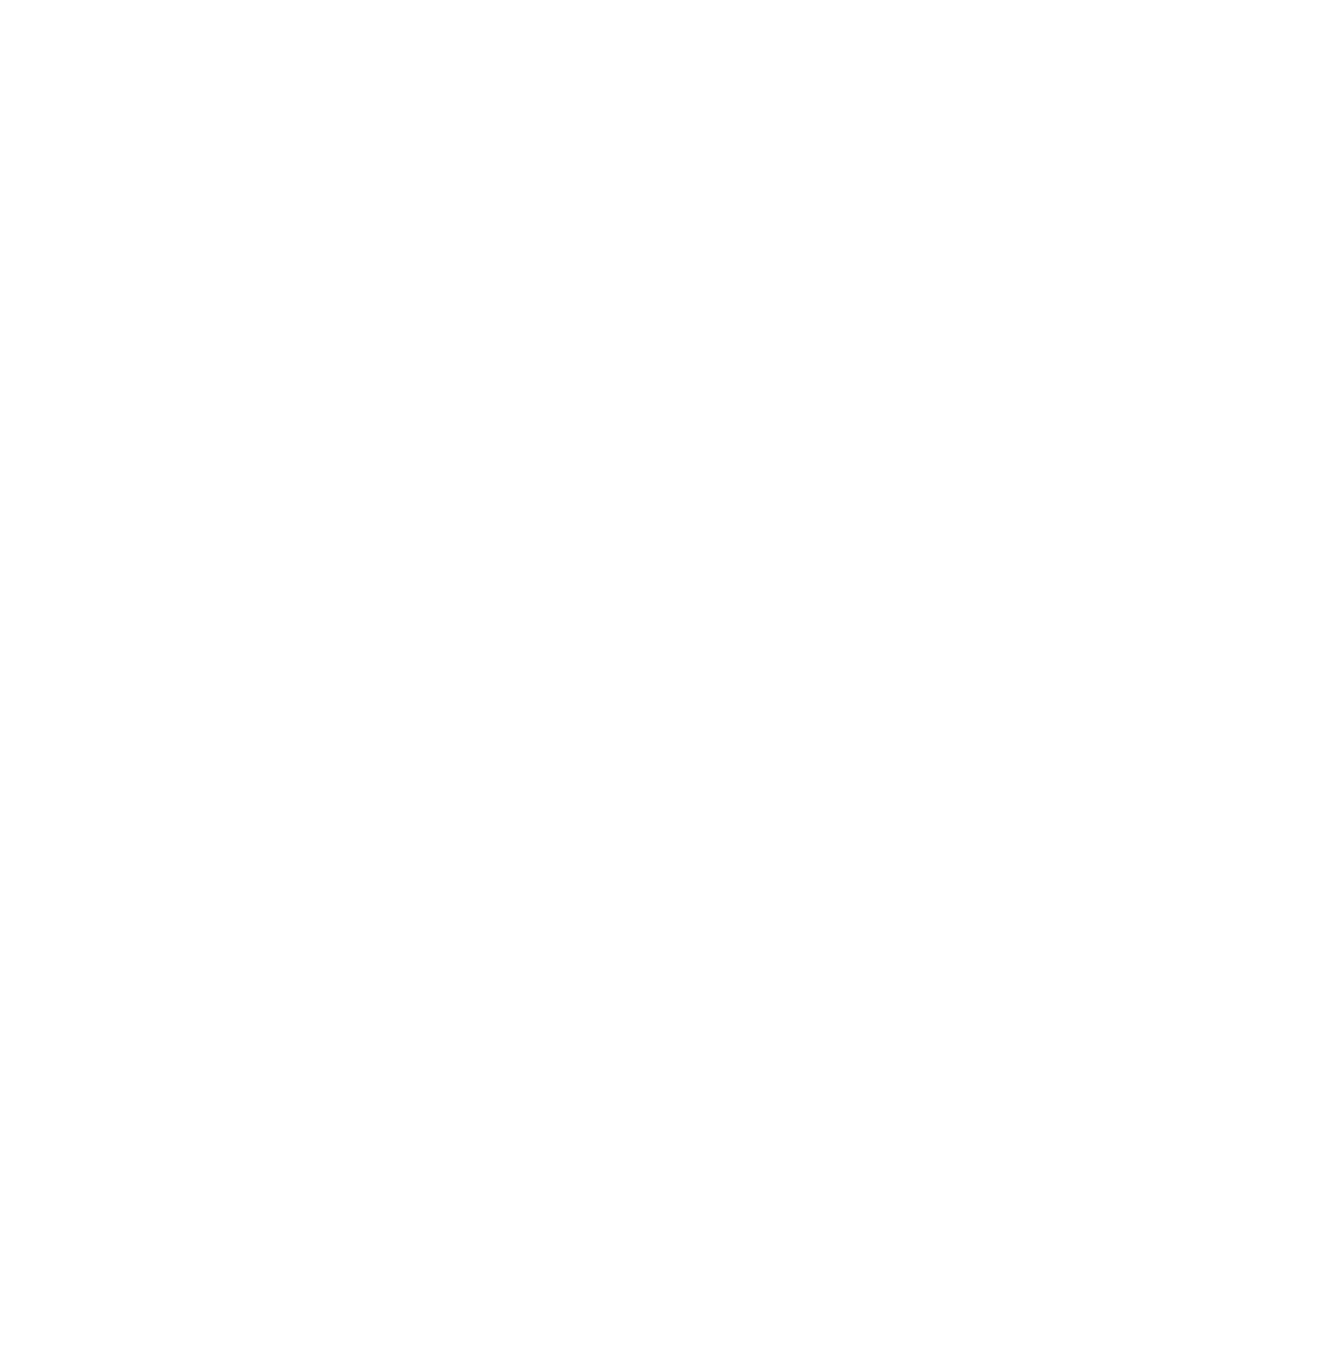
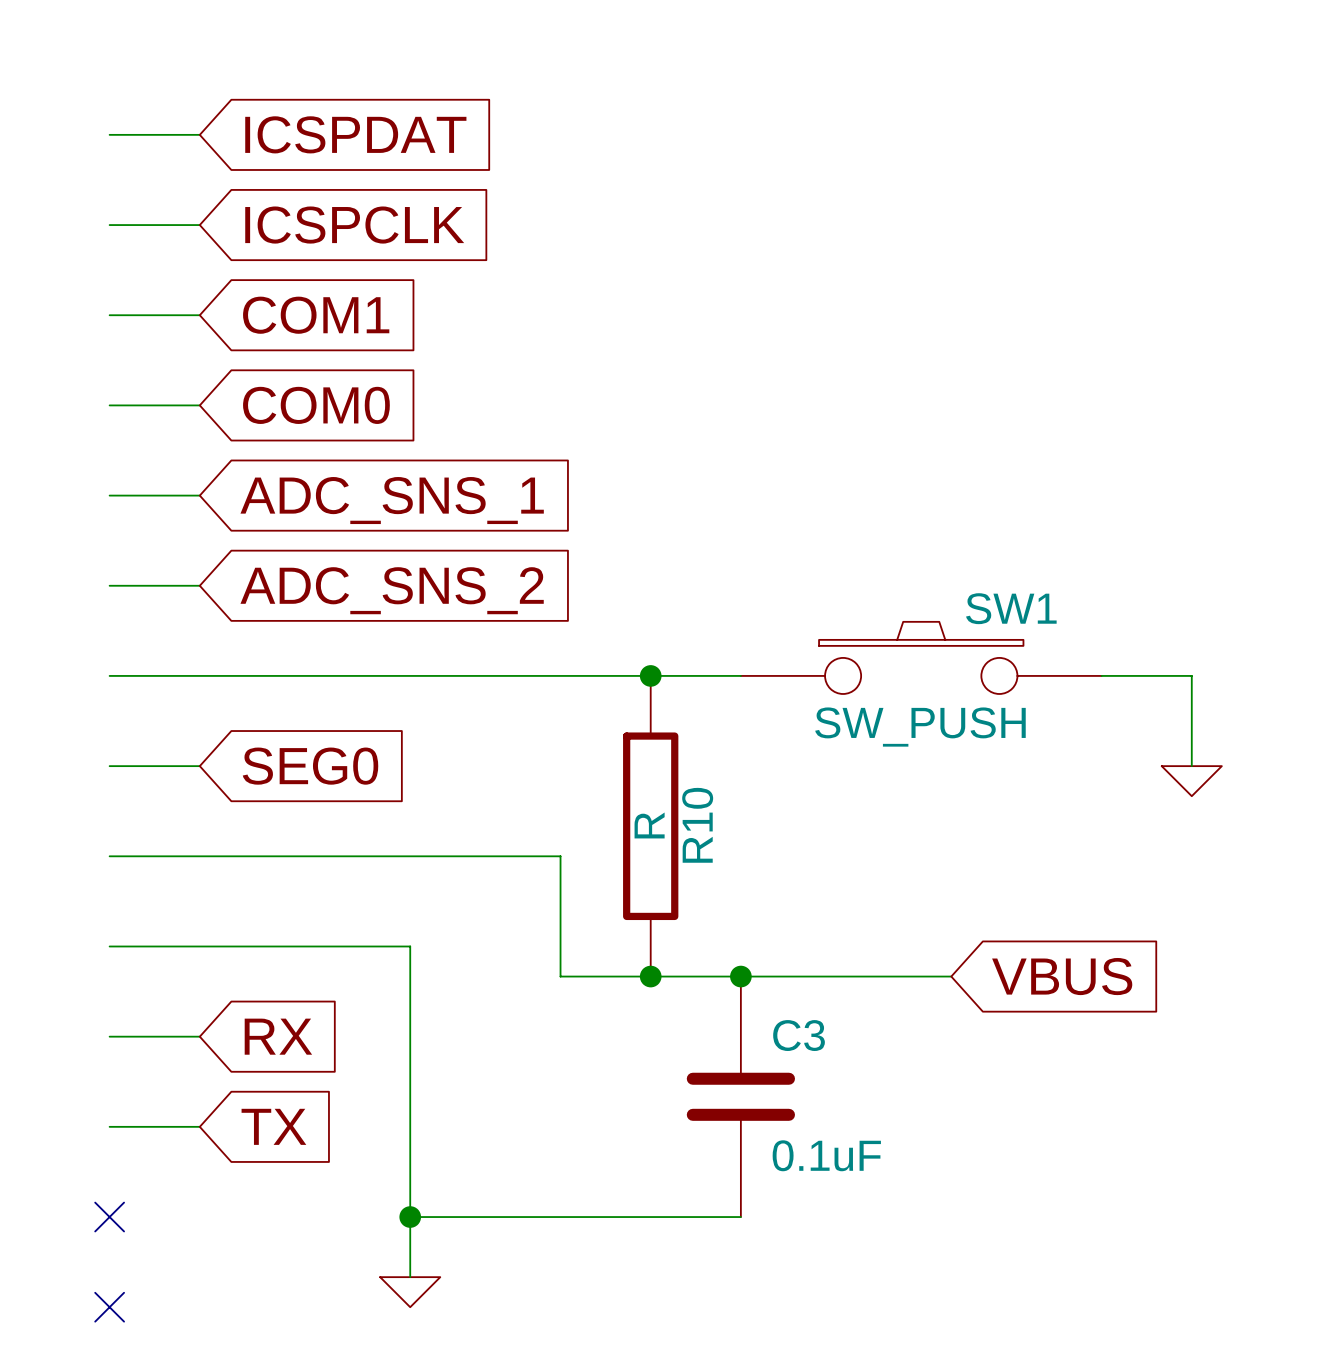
wire: none -> (109, 134) (199, 134)
global label: none -> ICSPDAT (355, 134)
wire: none -> (109, 225) (199, 225)
global label: none -> ICSPCLK (354, 225)
wire: none -> (109, 315) (199, 315)
global label: none -> COM1 (316, 315)
wire: none -> (109, 405) (199, 405)
global label: none -> COM0 (316, 405)
wire: none -> (109, 495) (199, 495)
global label: none -> ADC_SNS_1 (392, 500)
wire: none -> (109, 585) (199, 585)
global label: none -> ADC_SNS_2 (392, 590)
SW1: none -> SW_PUSH (921, 657)
wire: none -> (109, 675) (740, 675)
junction: none -> (650, 675)
wire: none -> (1101, 675) (1191, 675) (1191, 766)
wire: none -> (109, 766) (199, 766)
global label: none -> SEG0 (310, 766)
power symbol: none -> (1191, 781)
R10: none -> R (650, 826)
wire: none -> (109, 856) (560, 856) (560, 976) (951, 976)
wire: none -> (109, 946) (410, 946) (410, 1277)
junction: none -> (650, 976)
junction: none -> (740, 976)
global label: none -> VBUS (1062, 976)
wire: none -> (109, 1036) (199, 1036)
global label: none -> RX (278, 1036)
C3: none -> 0.1uF (740, 1096)
wire: none -> (109, 1126) (199, 1126)
global label: none -> TX (273, 1126)
no-connect mark: none -> (109, 1217)
wire: none -> (410, 1217) (740, 1217)
junction: none -> (410, 1217)
power symbol: none -> (410, 1292)
no-connect mark: none -> (109, 1307)

